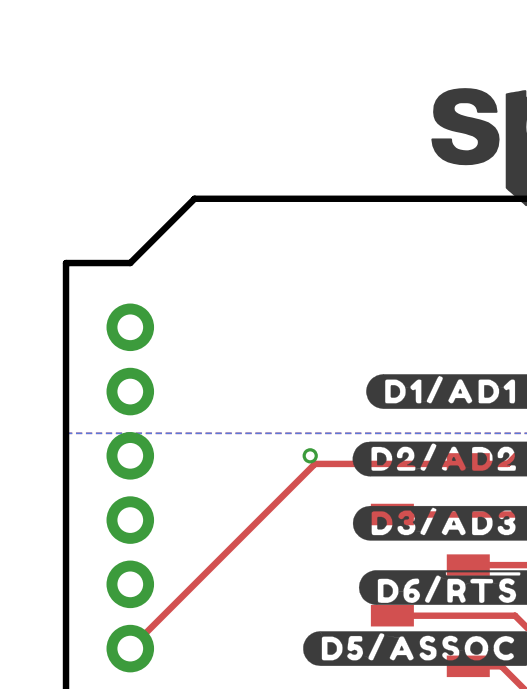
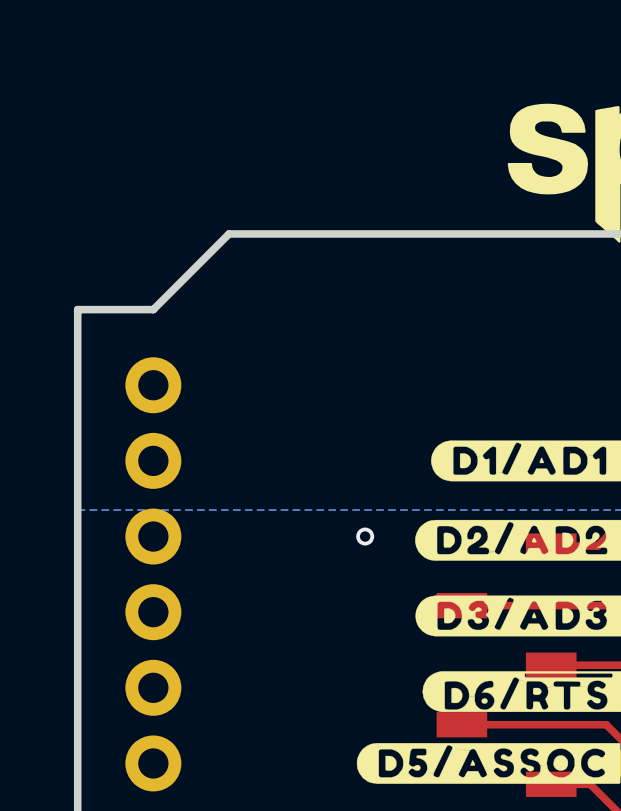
top track: (468, 463) (314, 463) (130, 648) -> none

